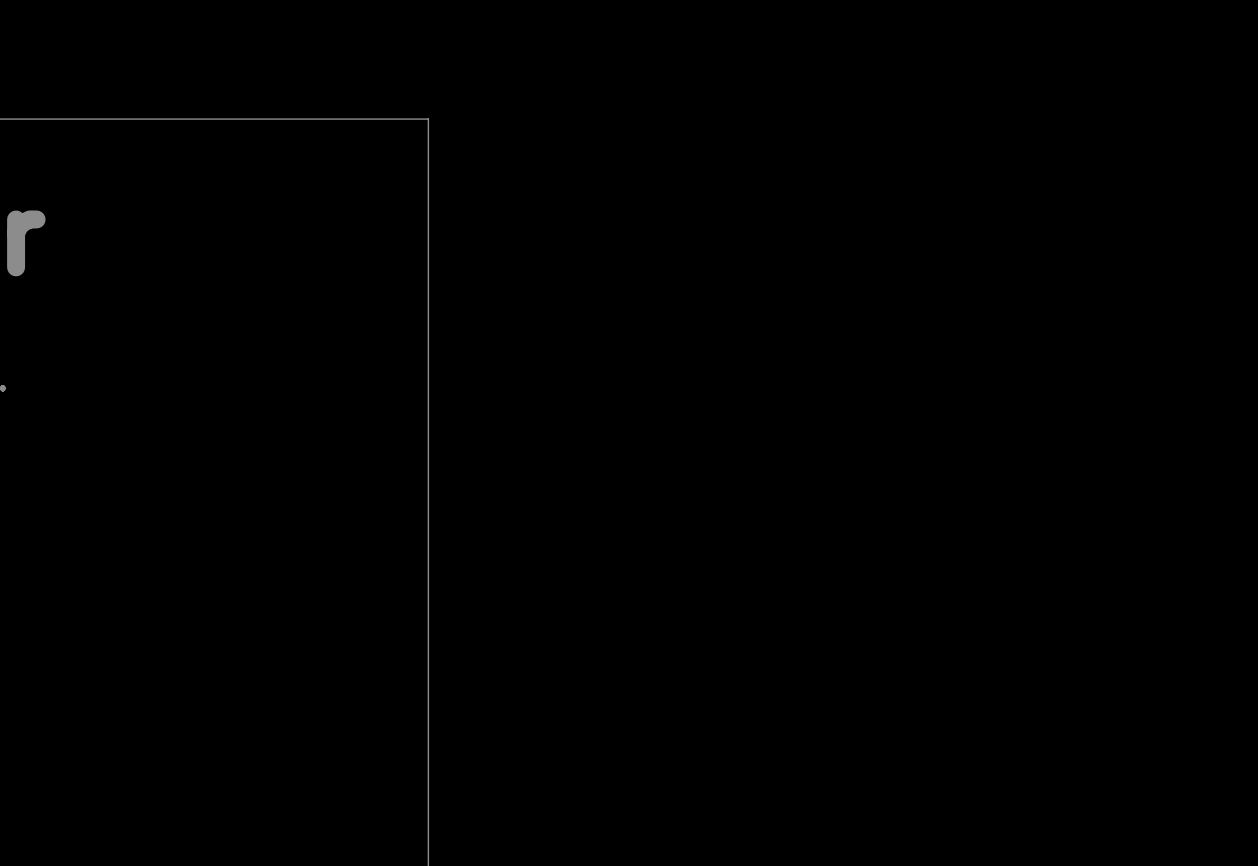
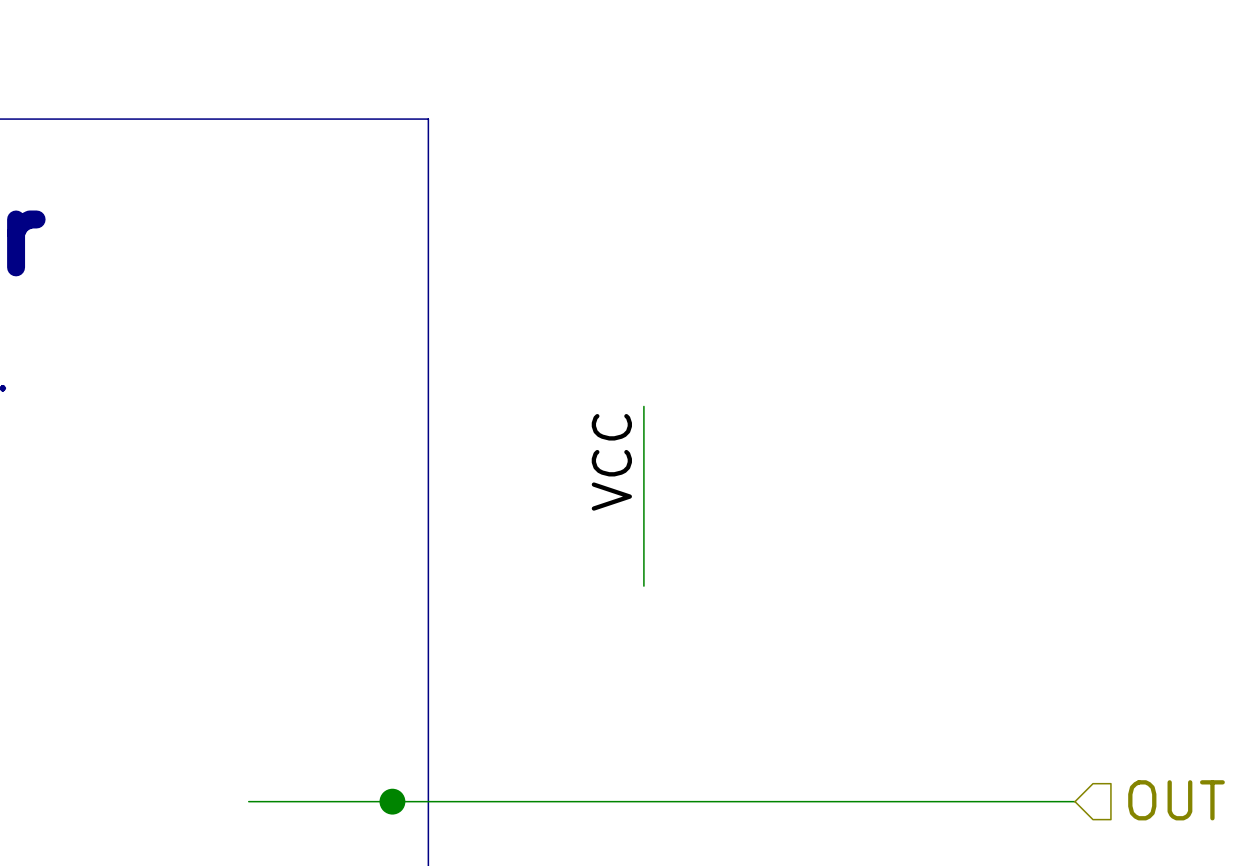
wire: none -> (643, 406) (643, 586)
label: none -> VCC (611, 462)
hierarchical label: none -> OUT (1176, 800)
wire: none -> (248, 801) (1075, 801)
junction: none -> (392, 801)

